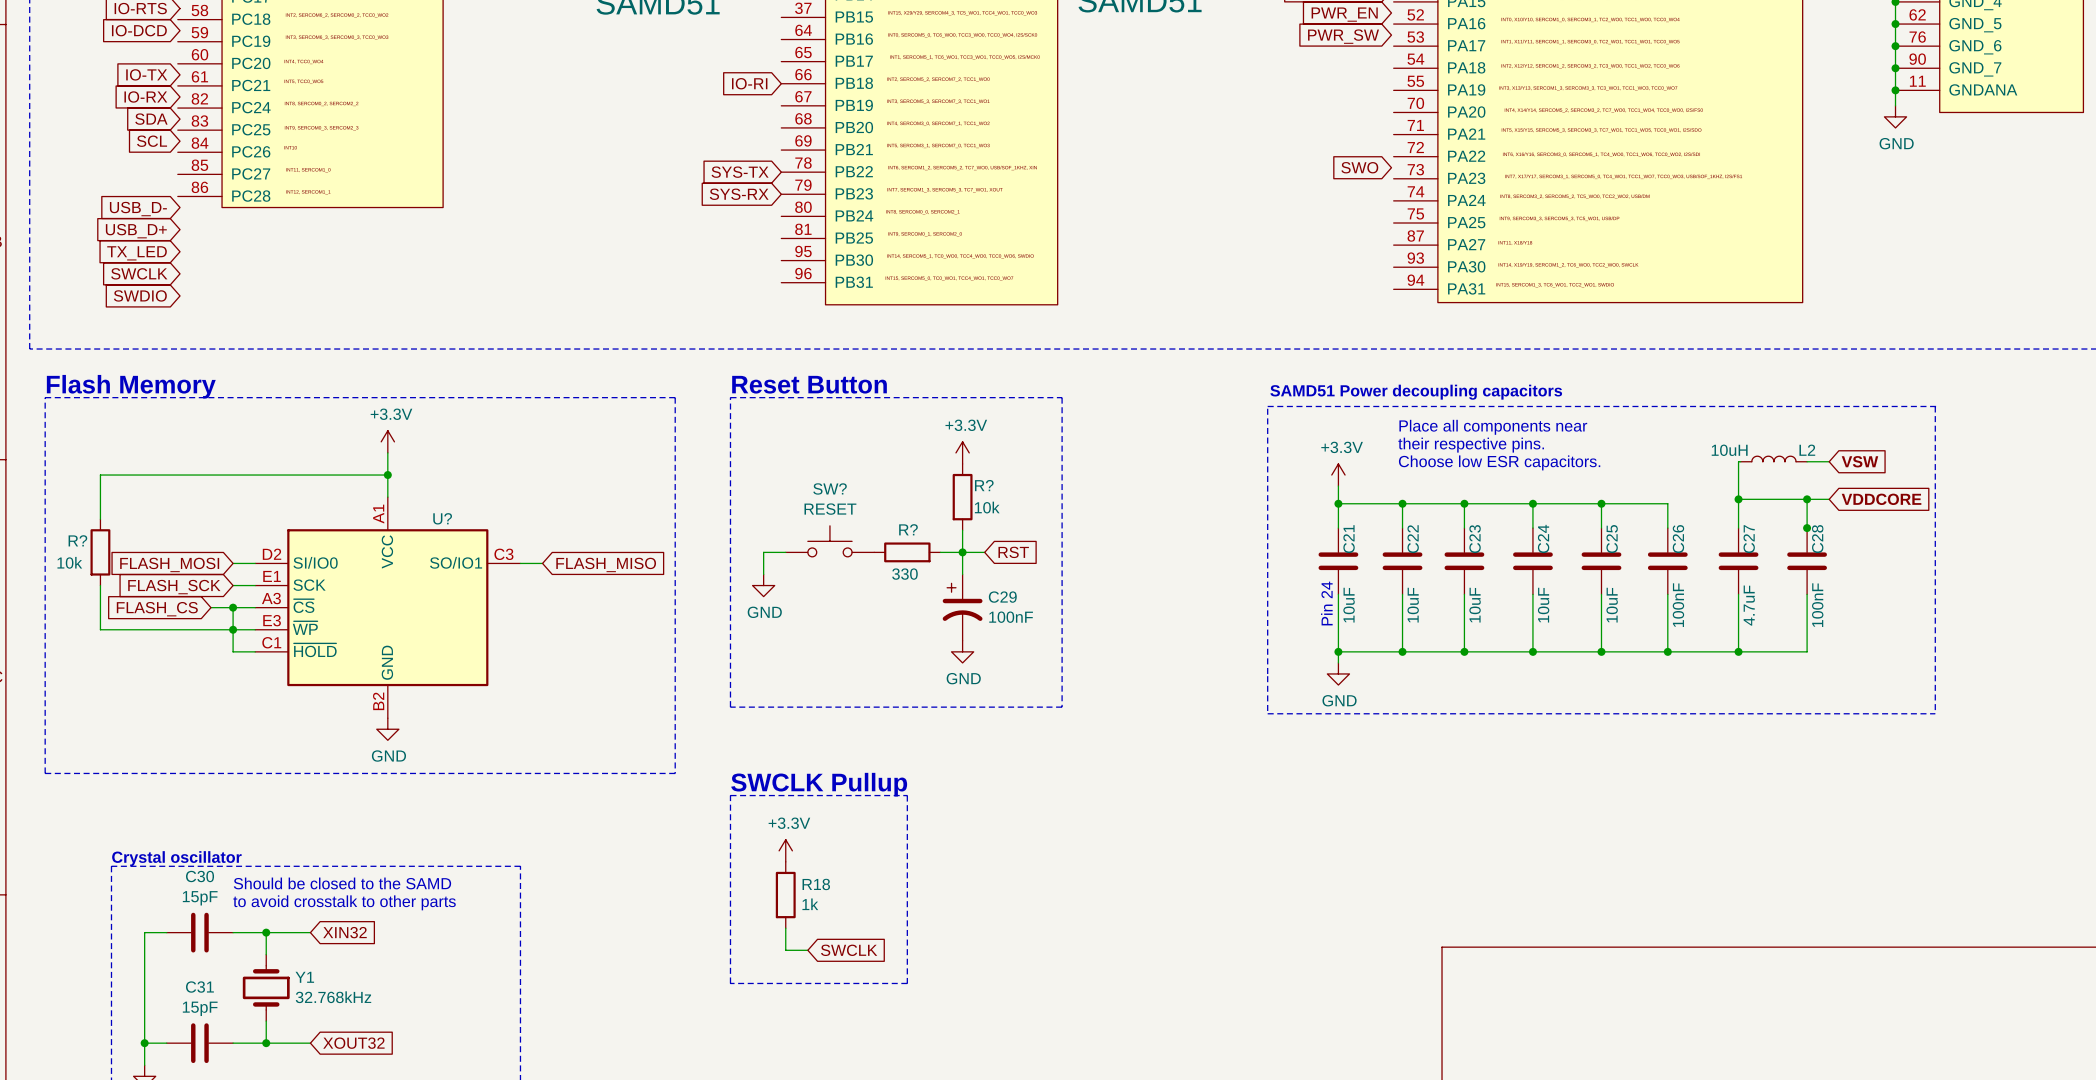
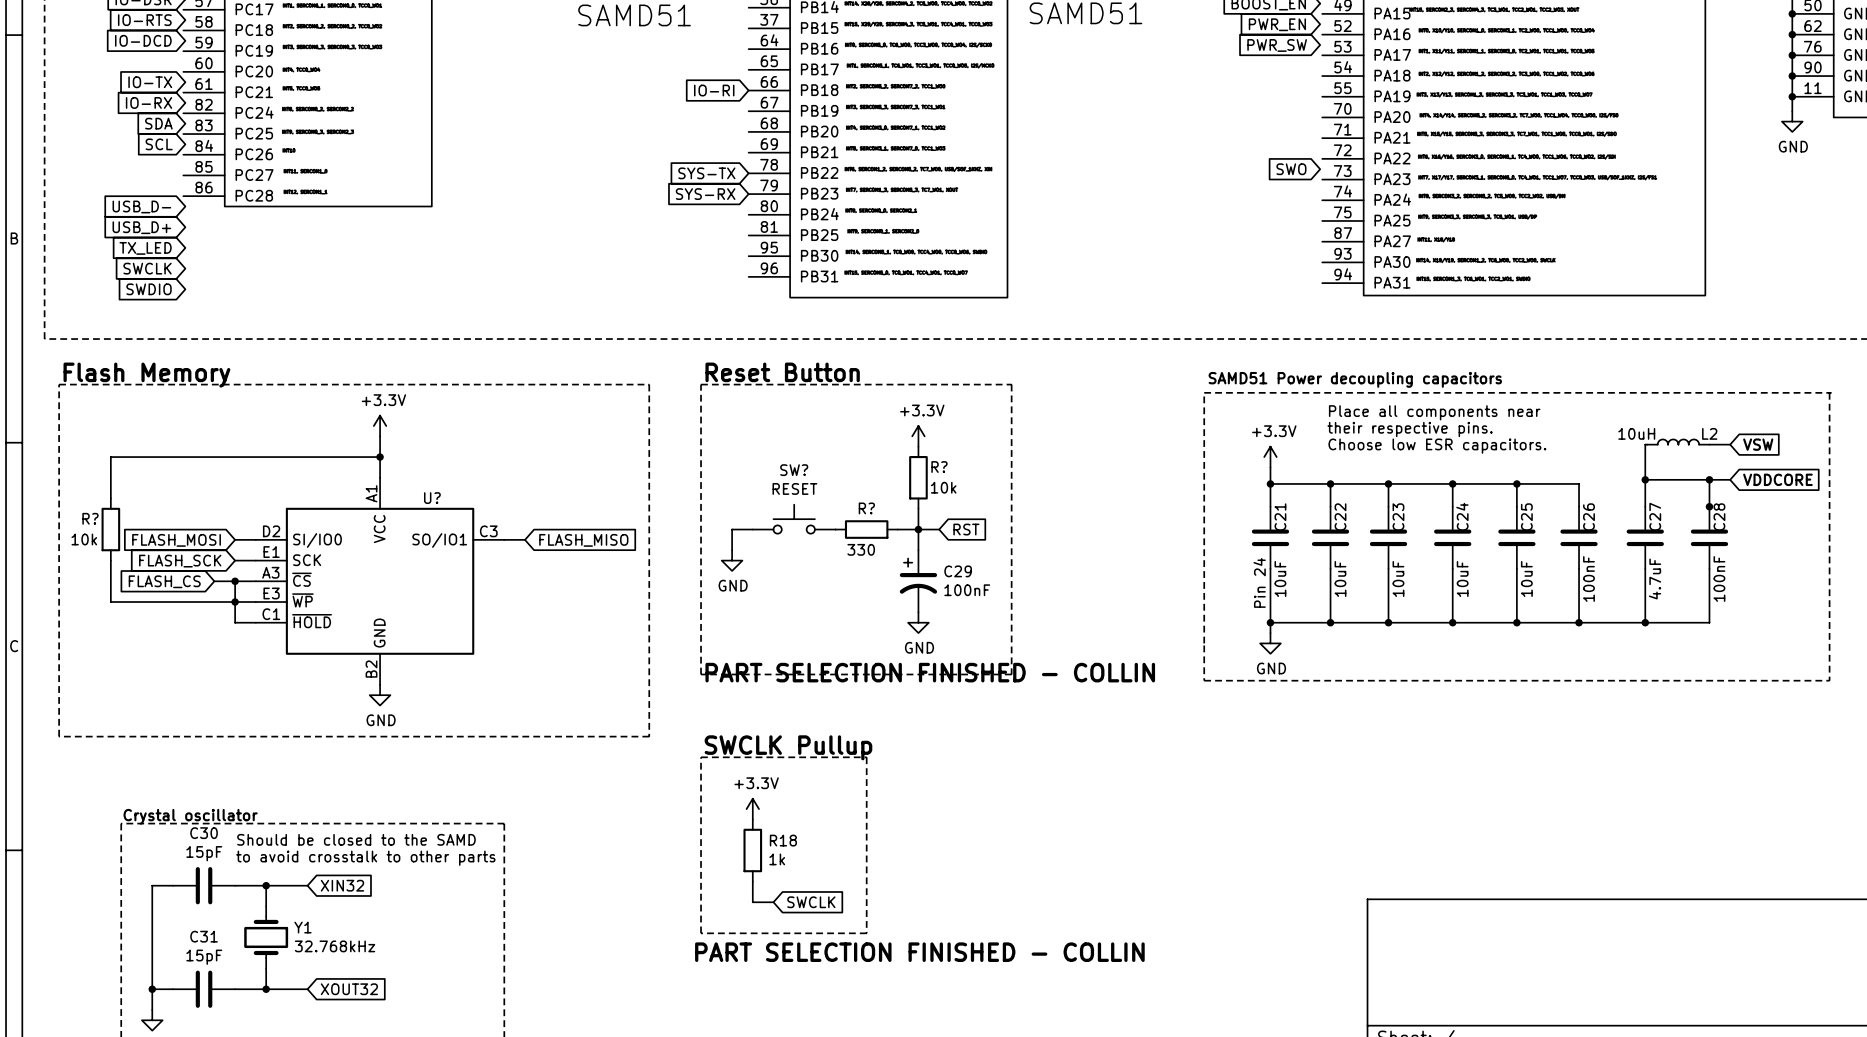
text: none -> PART SELECTION FINISHED - COLLIN (930, 672)
text: none -> PART SELECTION FINISHED - COLLIN (919, 952)

